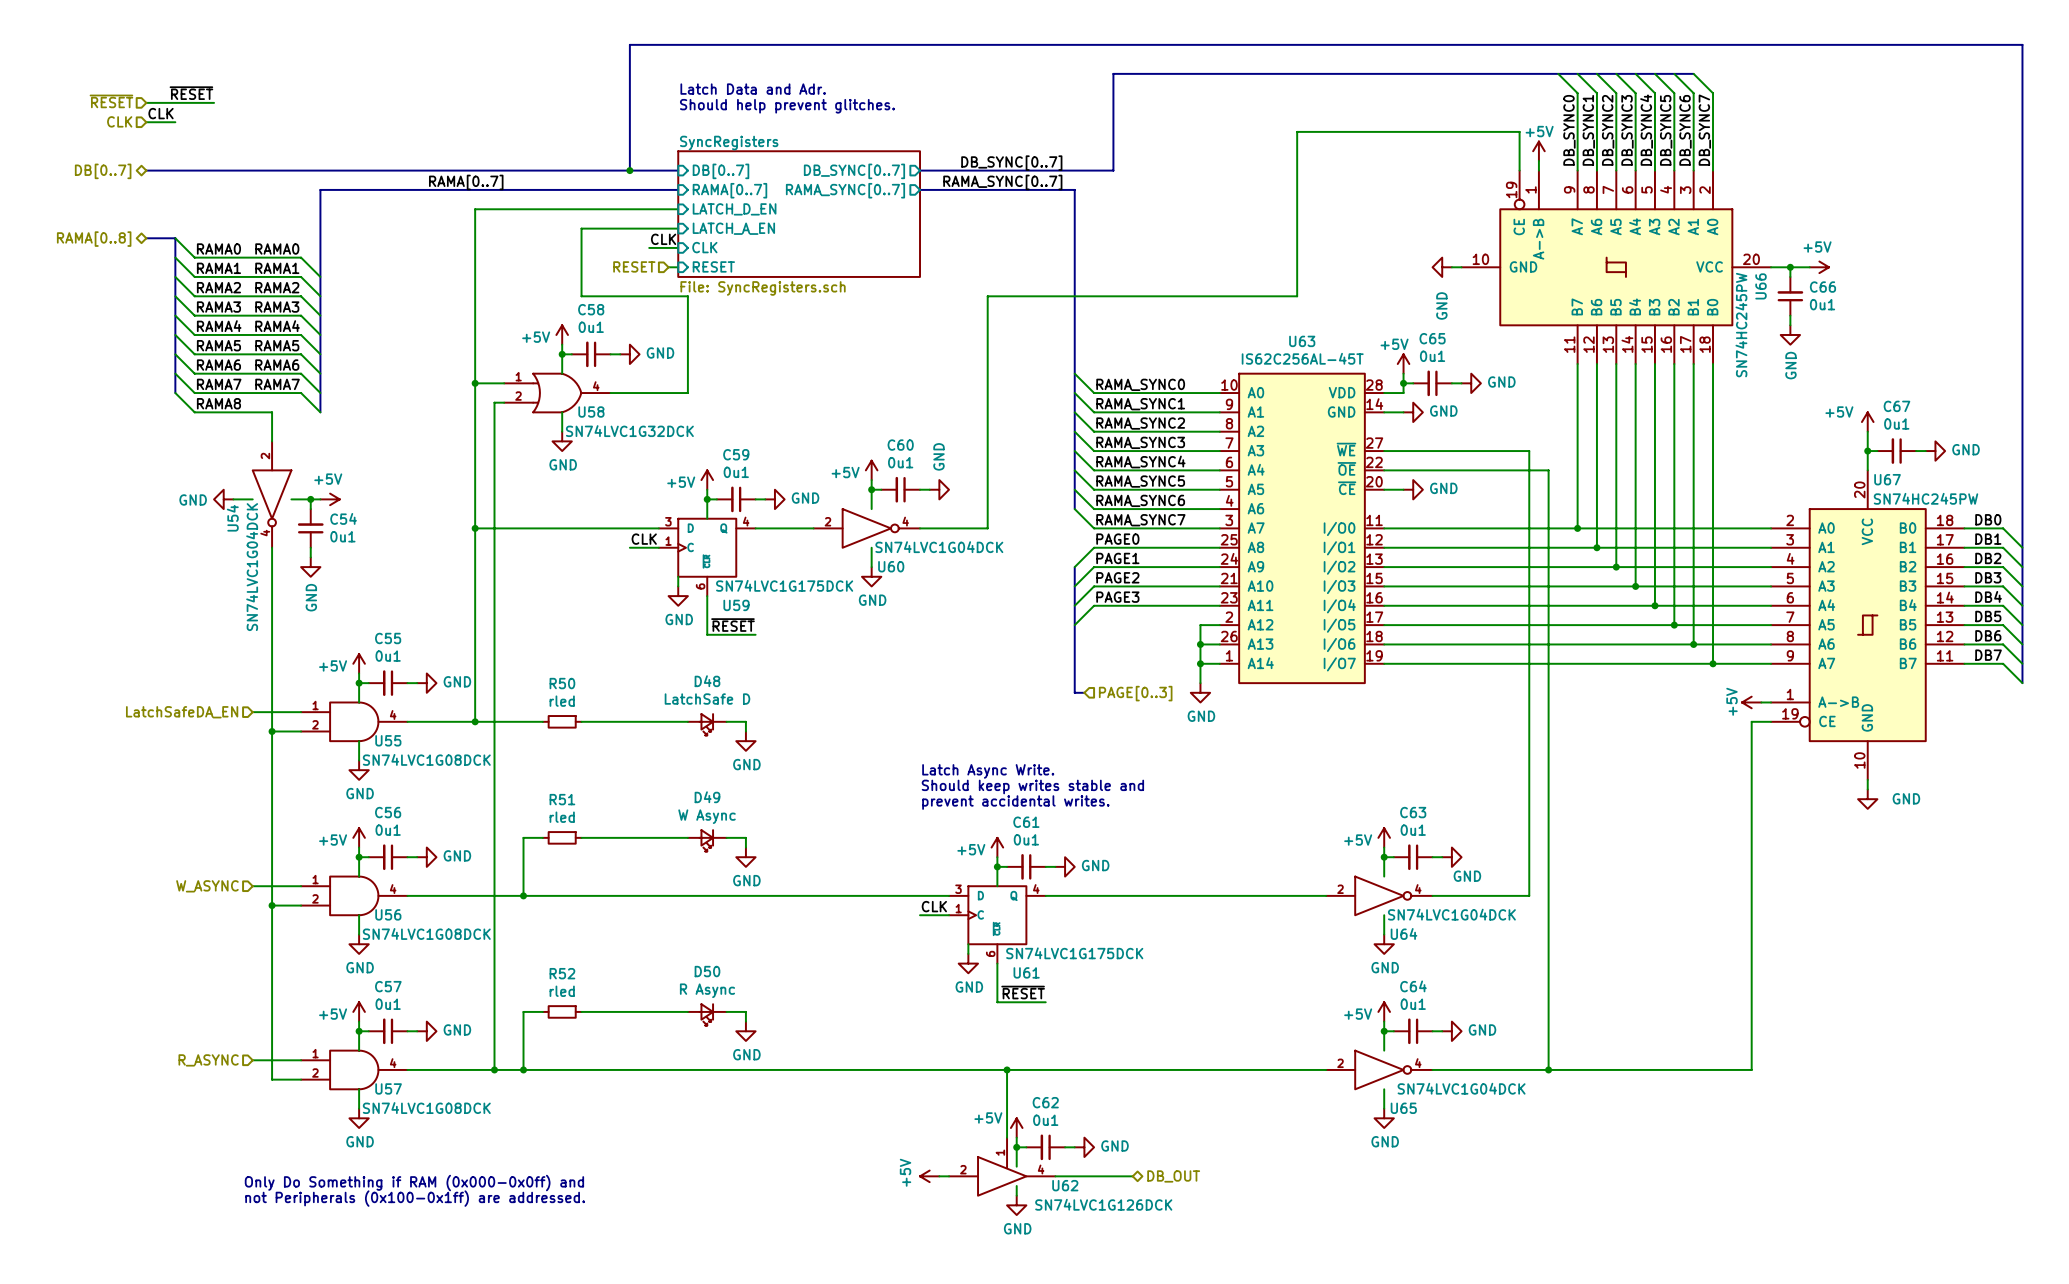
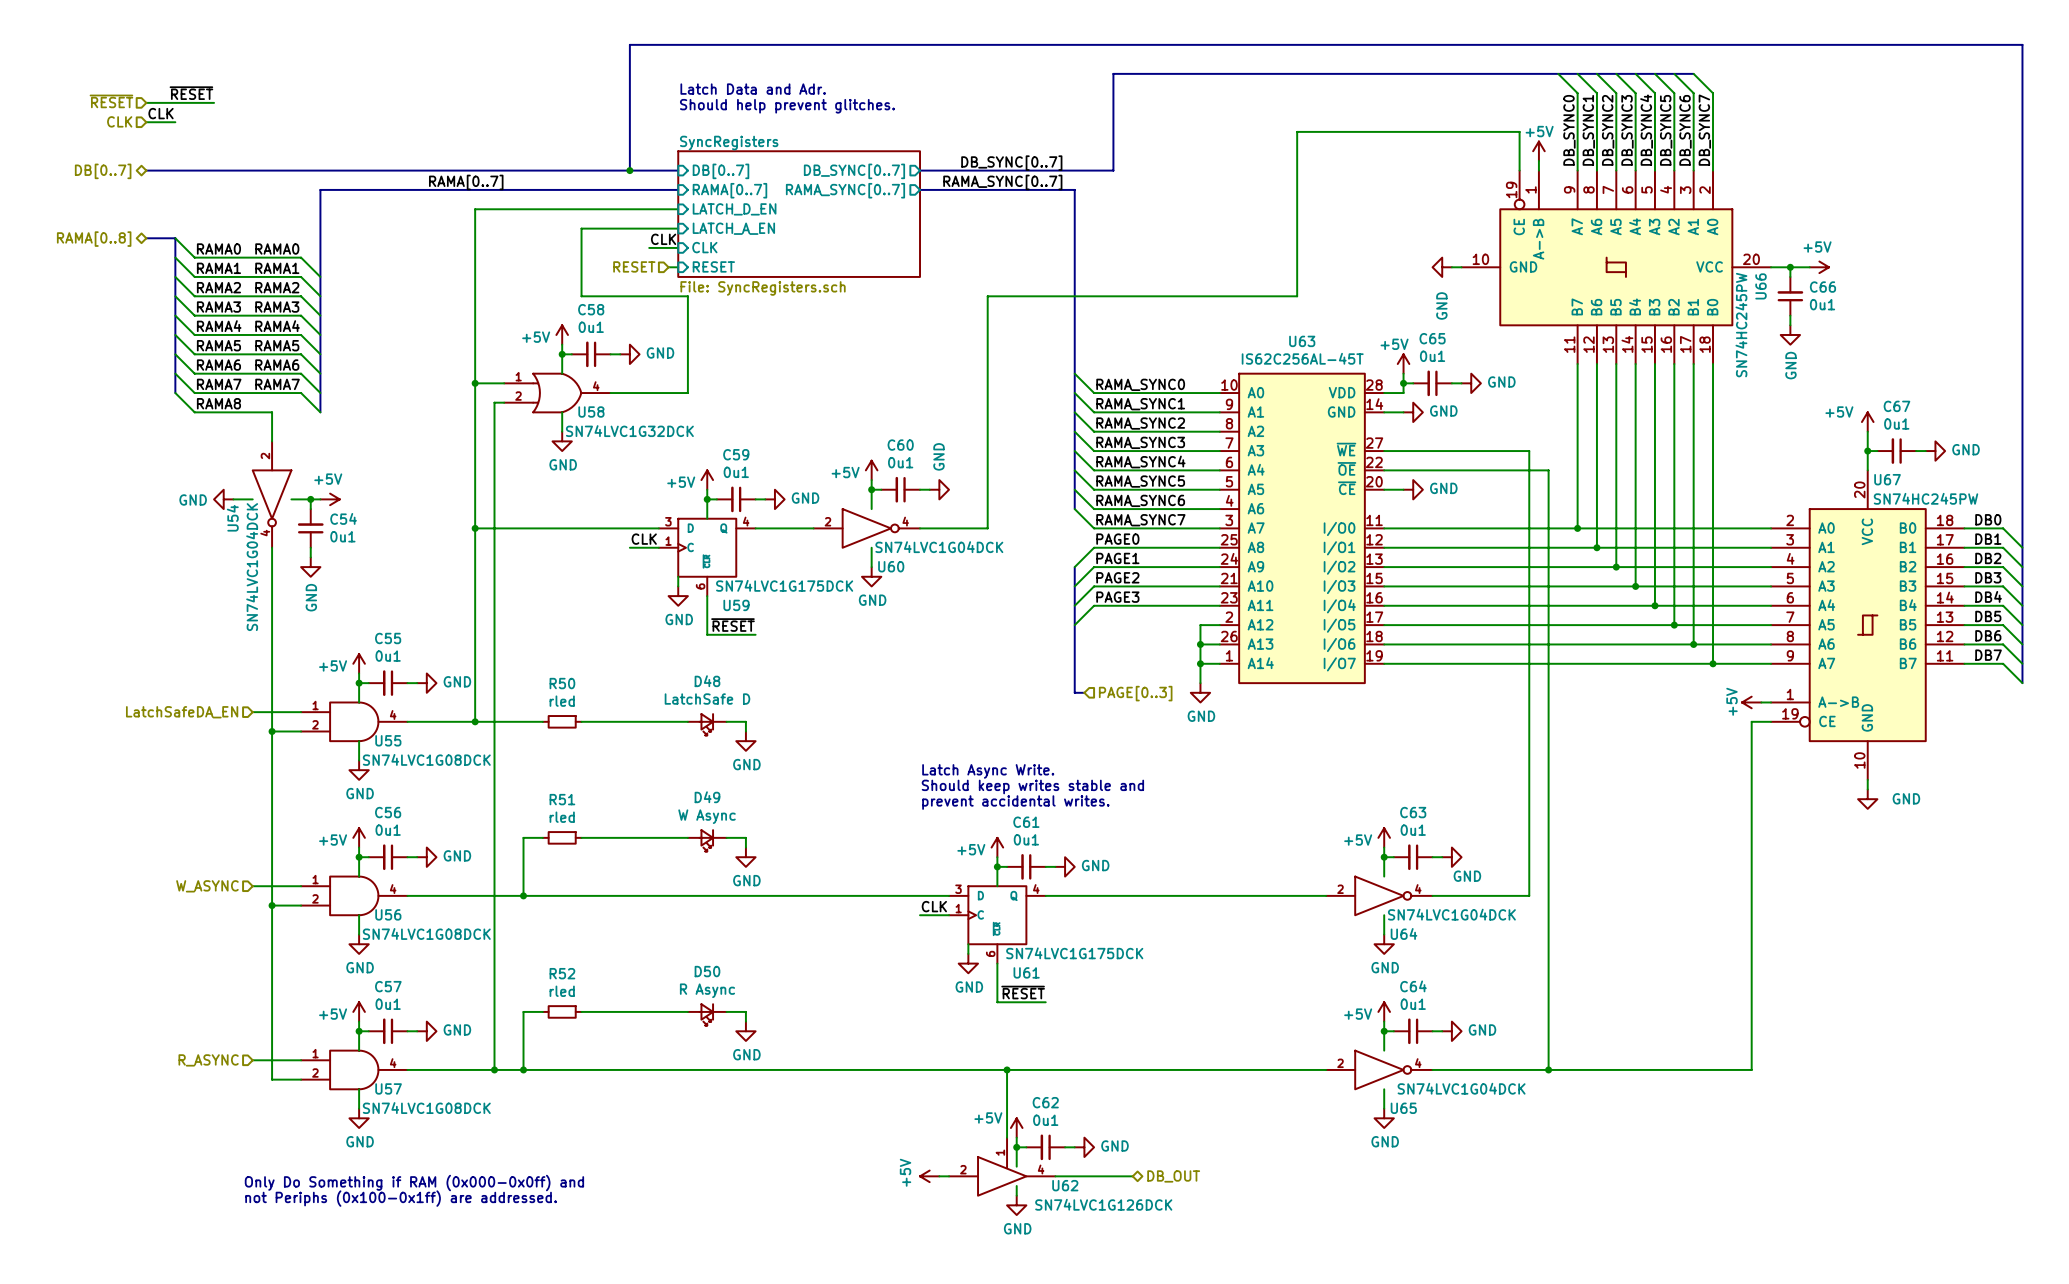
text: not Peripherals (0x100-0x1ff) are addressed. (415, 1198) -> not Periphs (0x100-0x1ff) are addressed. (401, 1198)

